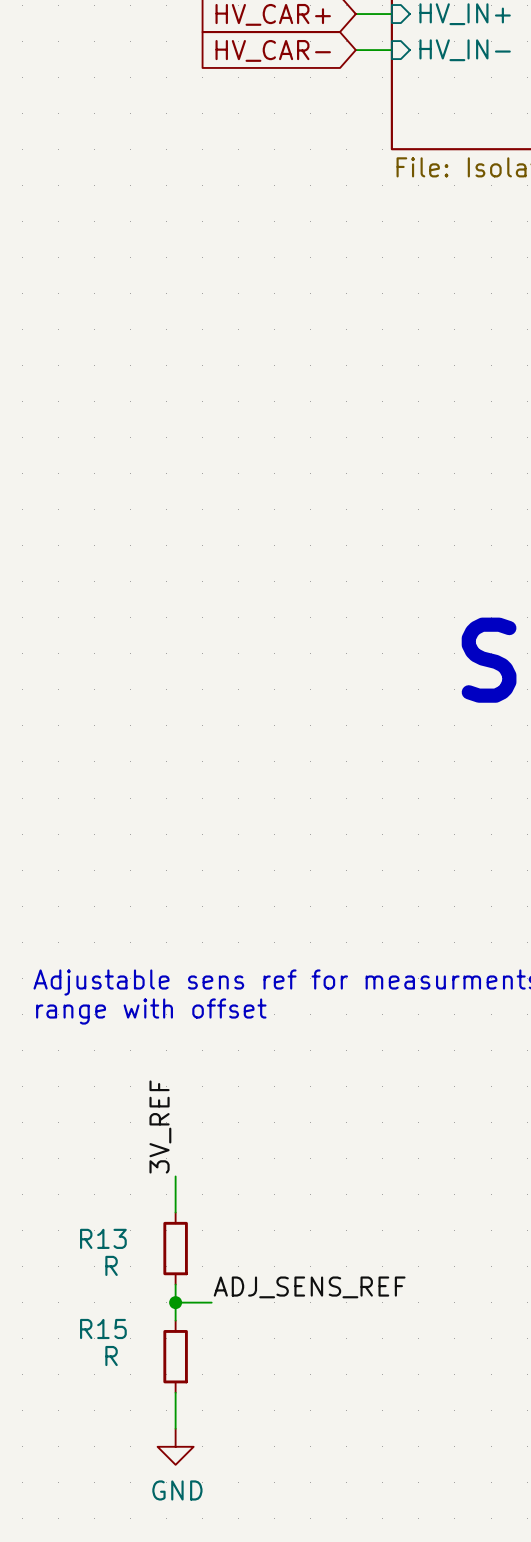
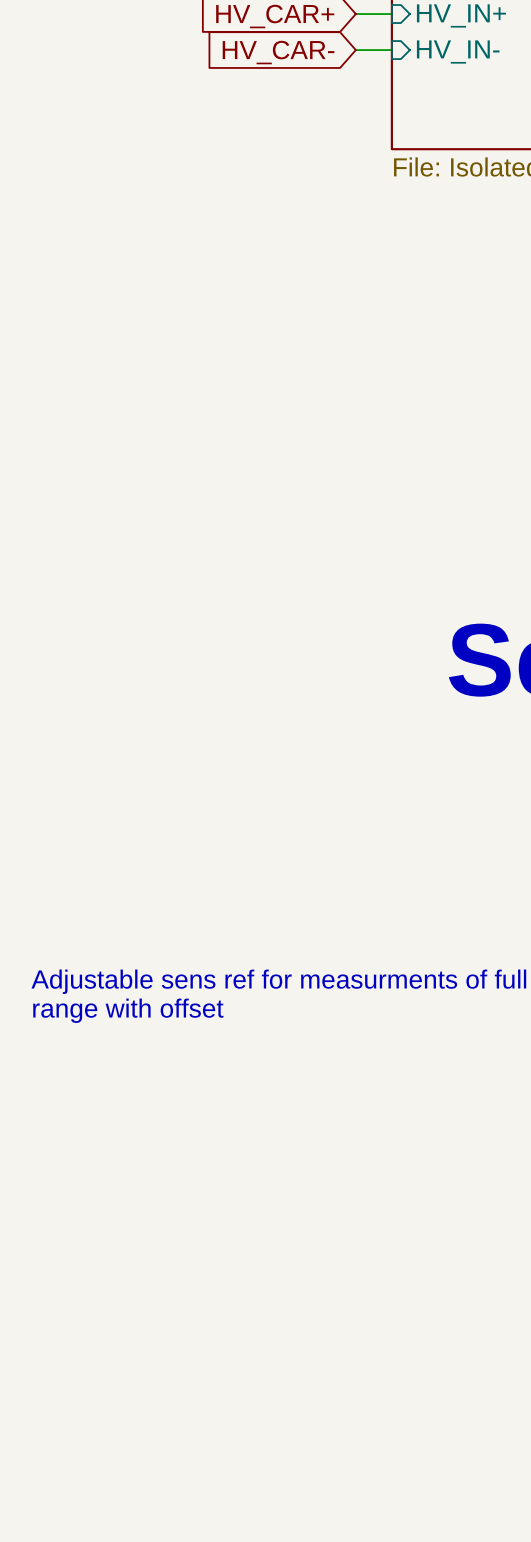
label: 3V_REF (160, 1126) -> none
wire: (175, 1176) (175, 1212) -> none
R13: R (175, 1248) -> none
wire: (175, 1284) (175, 1320) -> none
label: ADJ_SENS_REF (309, 1287) -> none
wire: (175, 1302) (211, 1302) -> none
junction: (175, 1302) -> none
R15: R (175, 1356) -> none
wire: (175, 1392) (175, 1428) -> none
power symbol: GND (175, 1446) -> none

